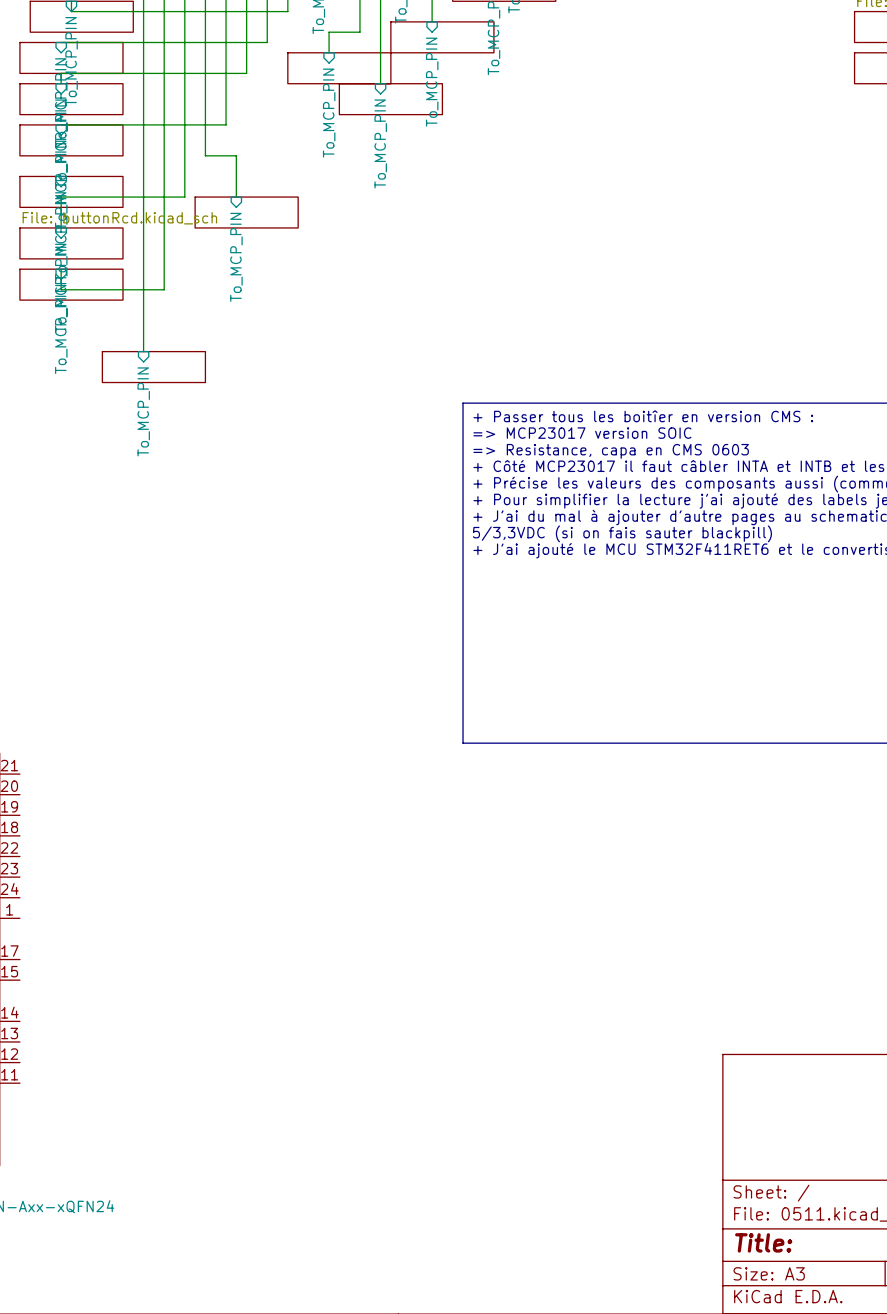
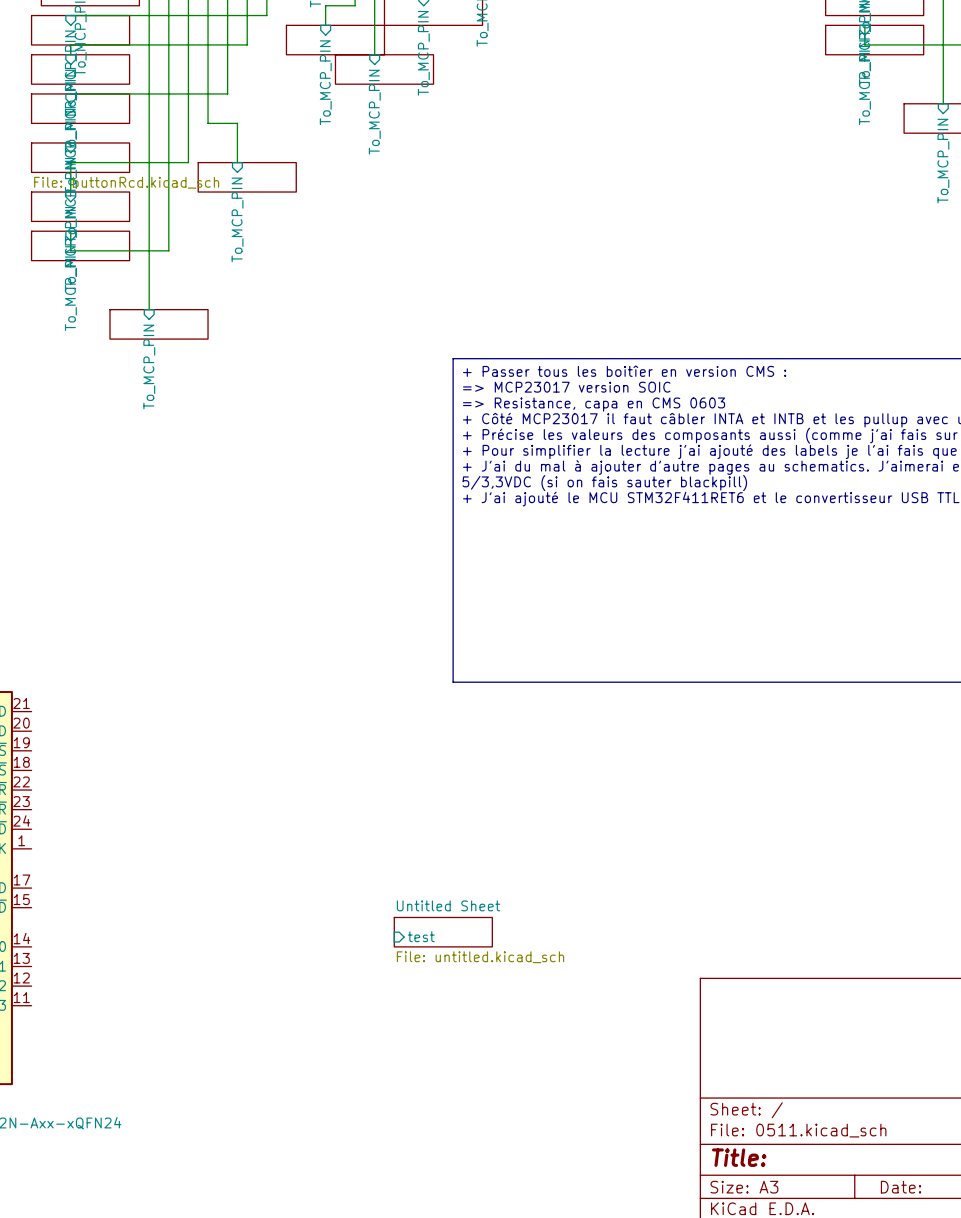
sheet Untitled Sheet: none -> File: untitled.kicad_sch (443, 932)
sheet pin: none -> test (421, 936)

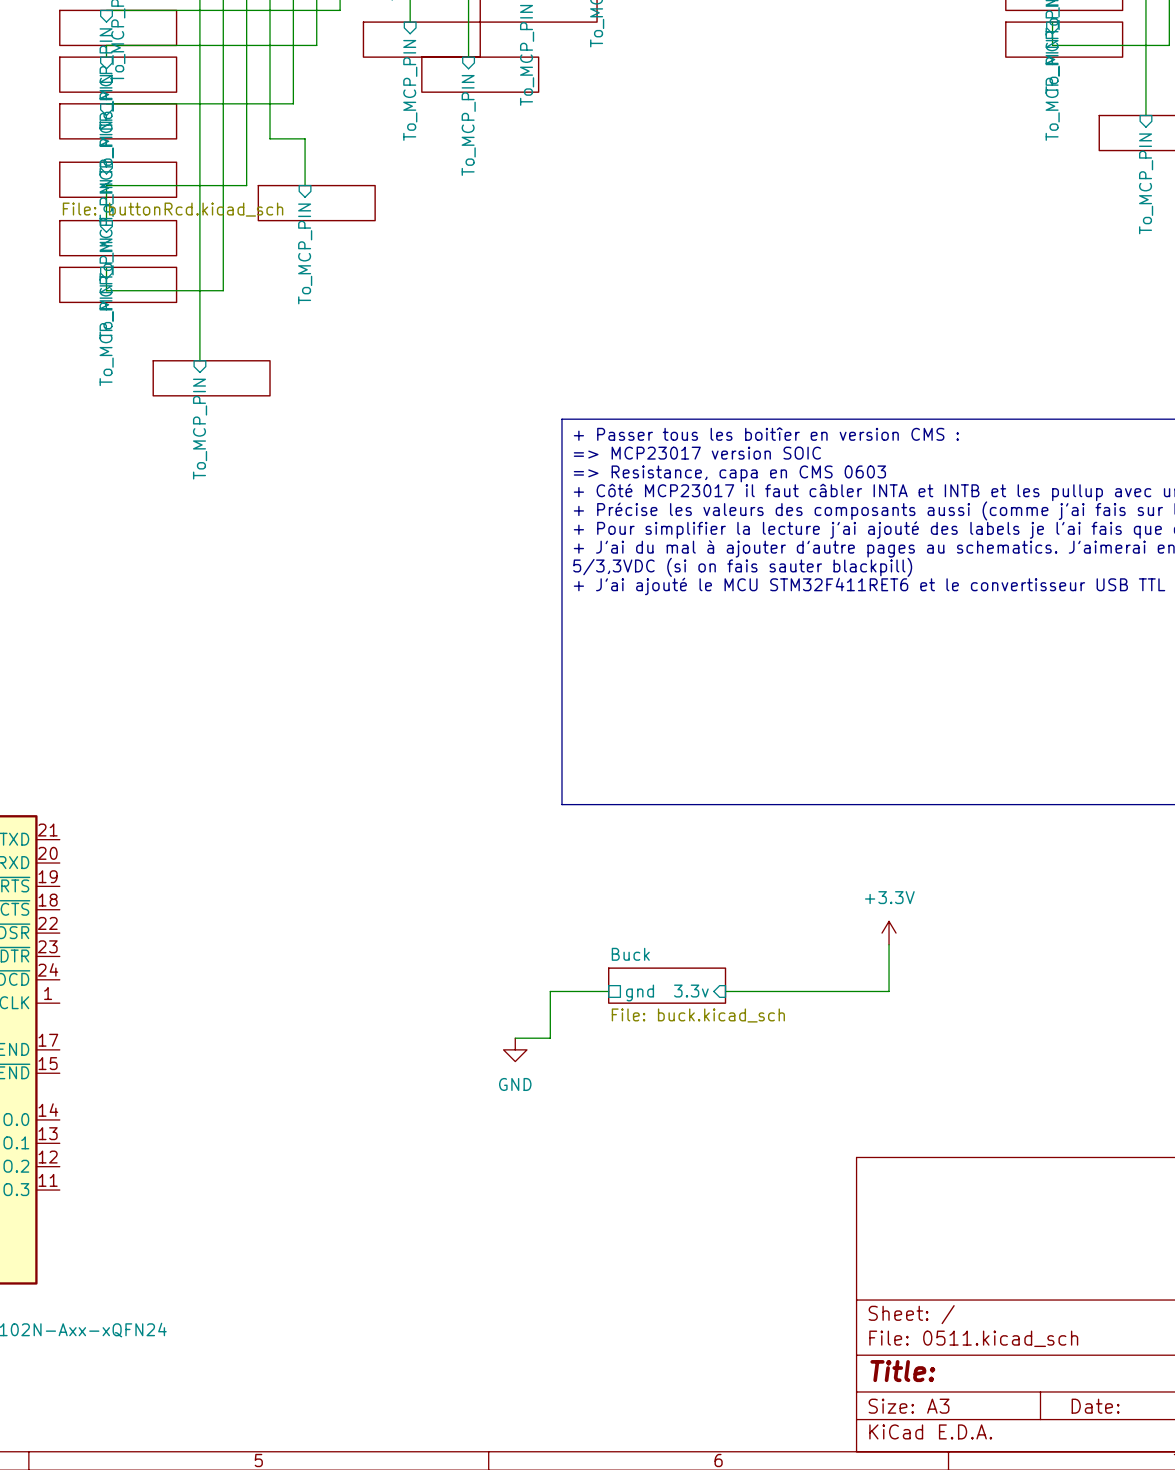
power symbol: none -> +3.3V (889, 933)
wire: none -> (889, 944) (889, 991) (725, 991)
sheet Buck: none -> File: buck.kicad_sch (667, 985)
sheet pin: none -> 3.3v (691, 991)
wire: none -> (608, 991) (550, 991) (550, 1038) (515, 1038)
sheet pin: none -> gnd (640, 992)
power symbol: none -> GND (515, 1049)
sheet Untitled Sheet: File: untitled.kicad_sch (443, 932) -> none
sheet pin: test (421, 936) -> none

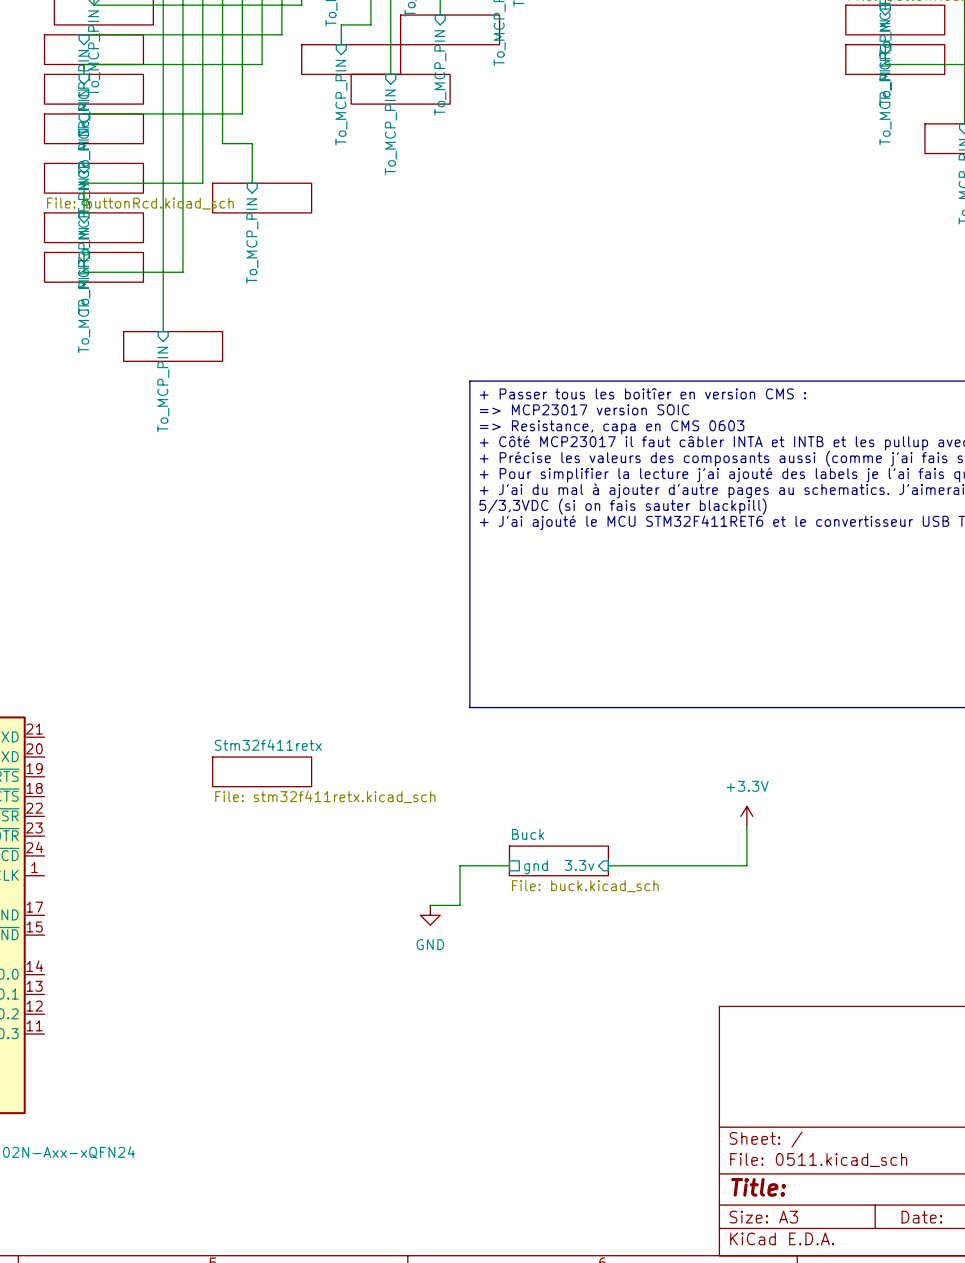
sheet Stm32f411retx: none -> File: stm32f411retx.kicad_sch (262, 771)

